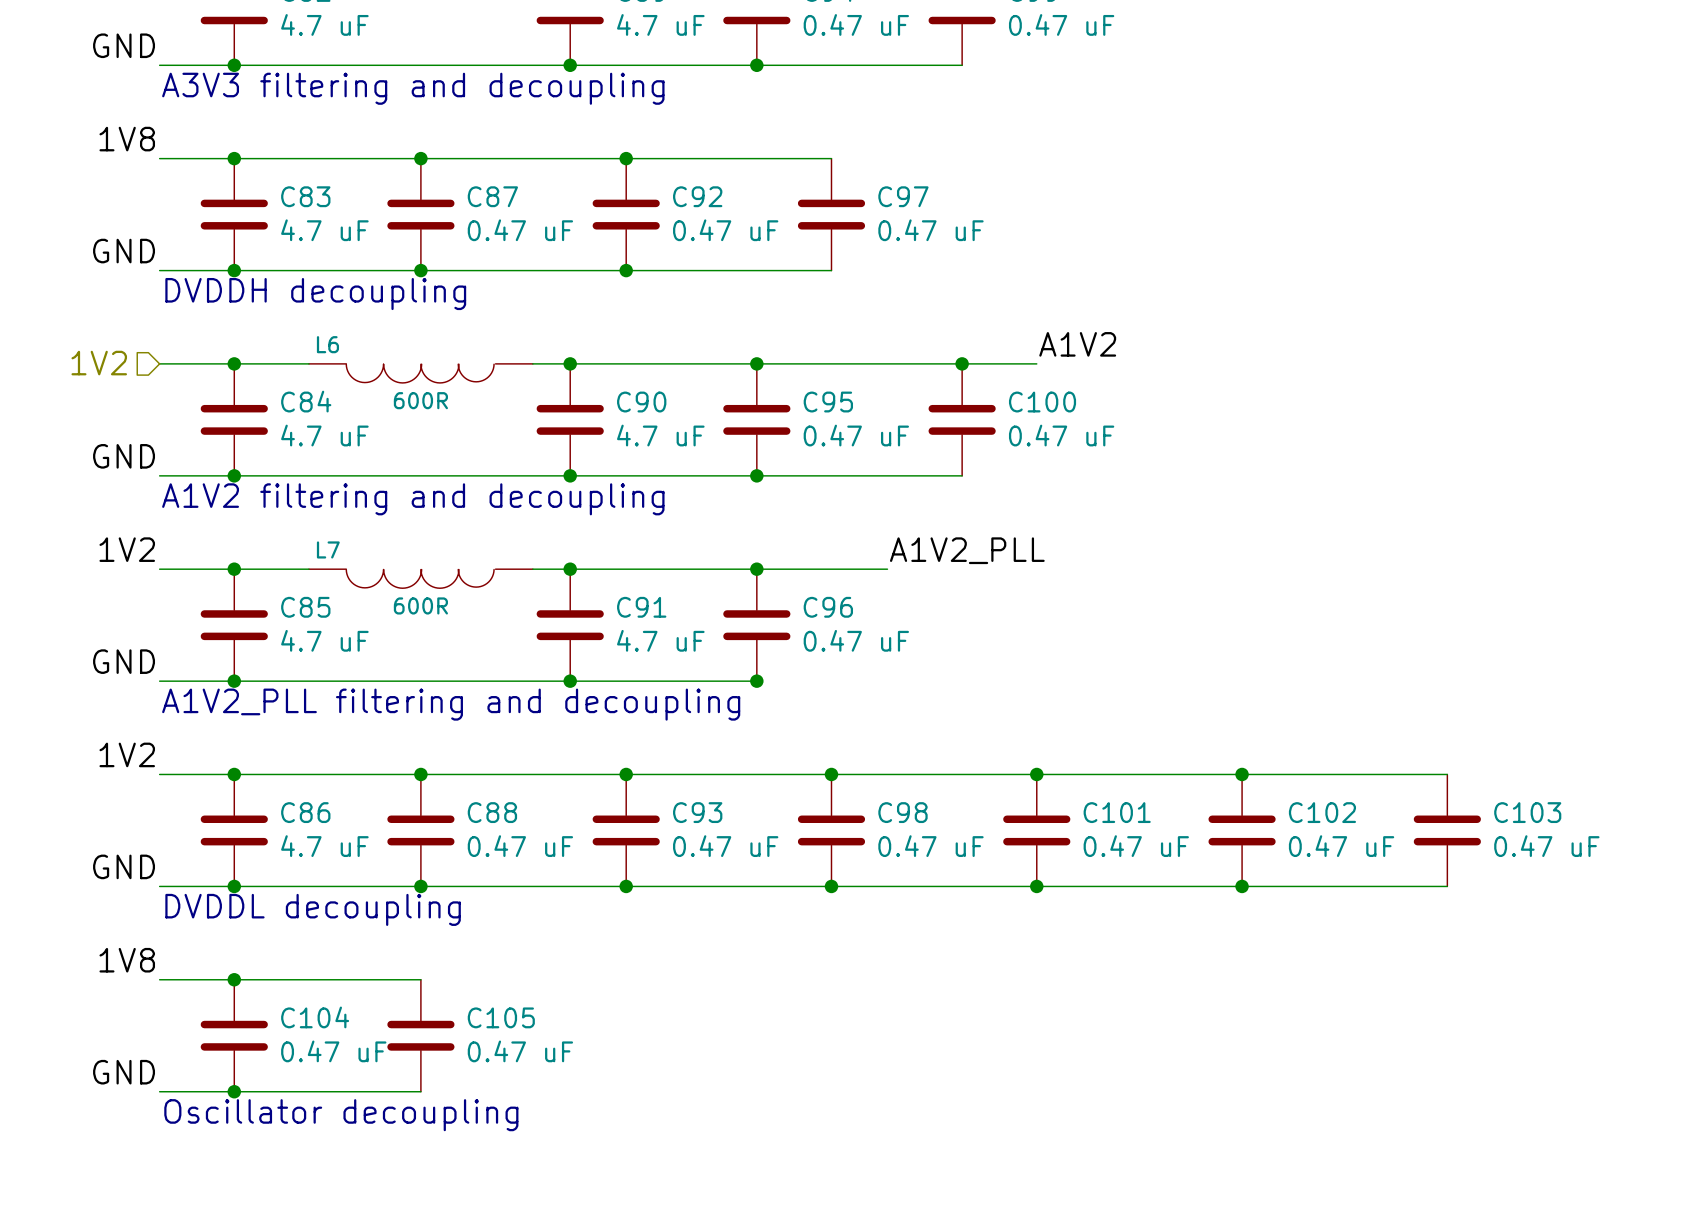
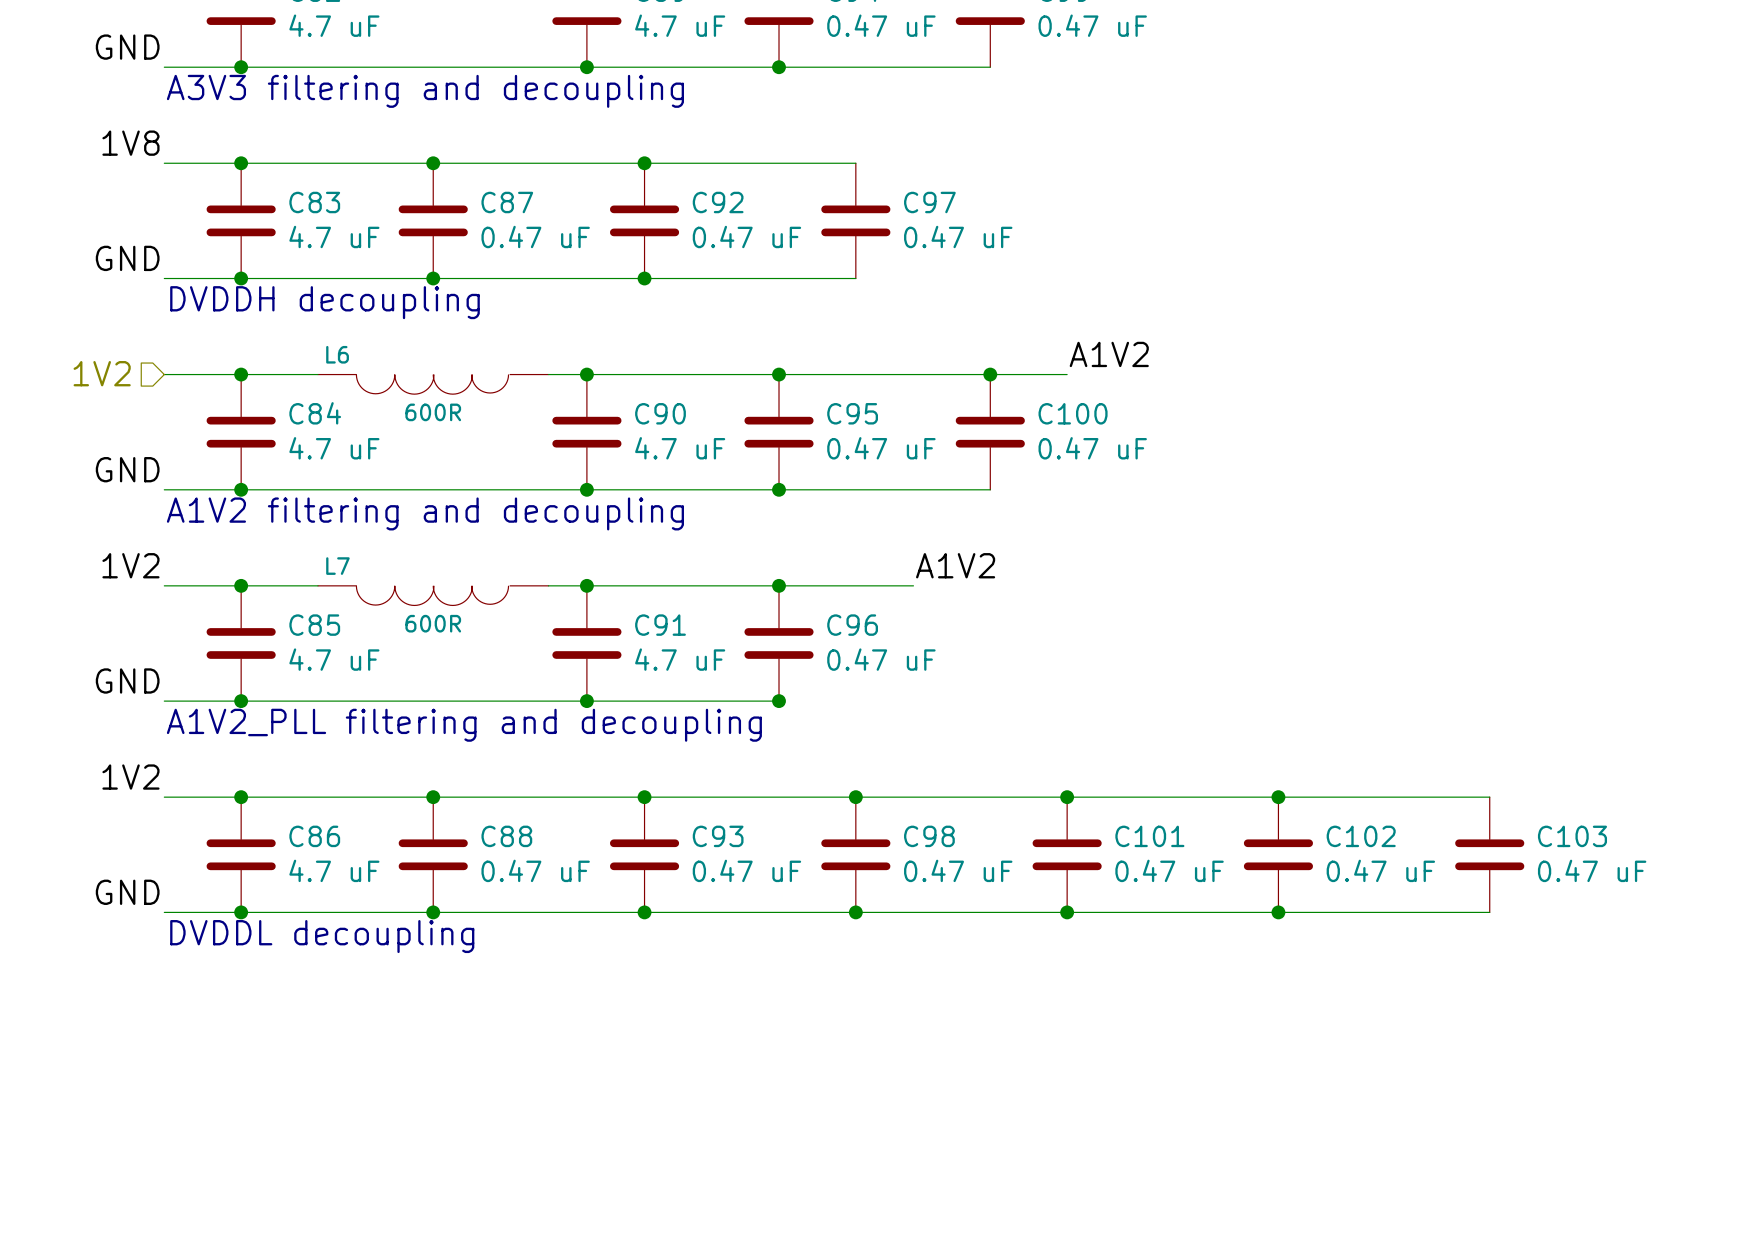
label: A1V2_PLL (967, 550) -> A1V2 (955, 565)
label: 1V8 (127, 960) -> none
wire: (159, 979) (420, 979) -> none
junction: (234, 979) -> none
C104: 0.47 uF (234, 1035) -> none
C105: 0.47 uF (420, 1035) -> none
label: GND (124, 1072) -> none
wire: (159, 1091) (420, 1091) -> none
junction: (234, 1091) -> none
text: Oscillator decoupling (341, 1115) -> none

